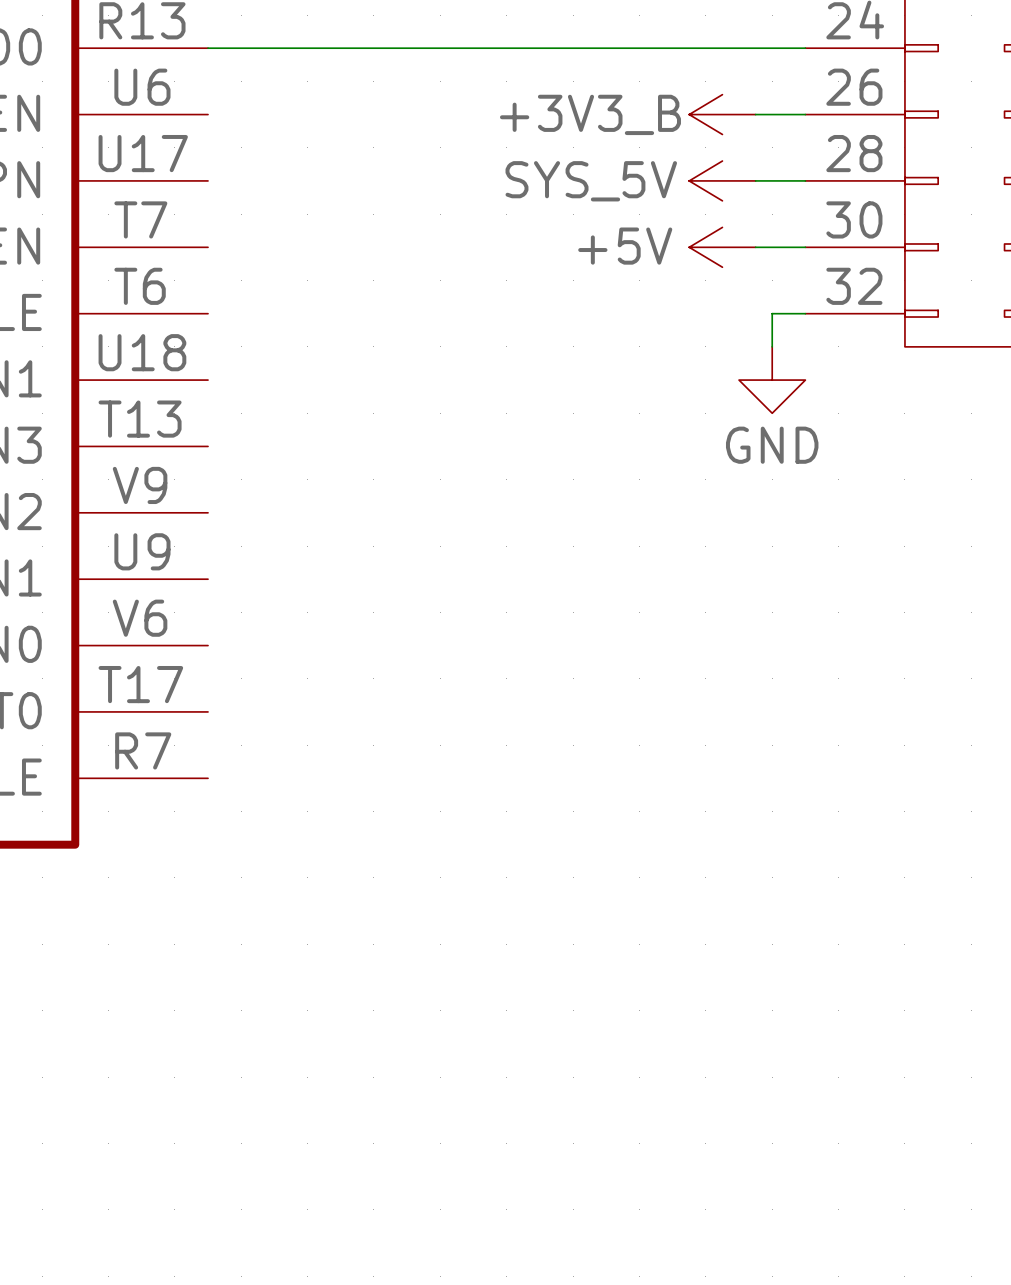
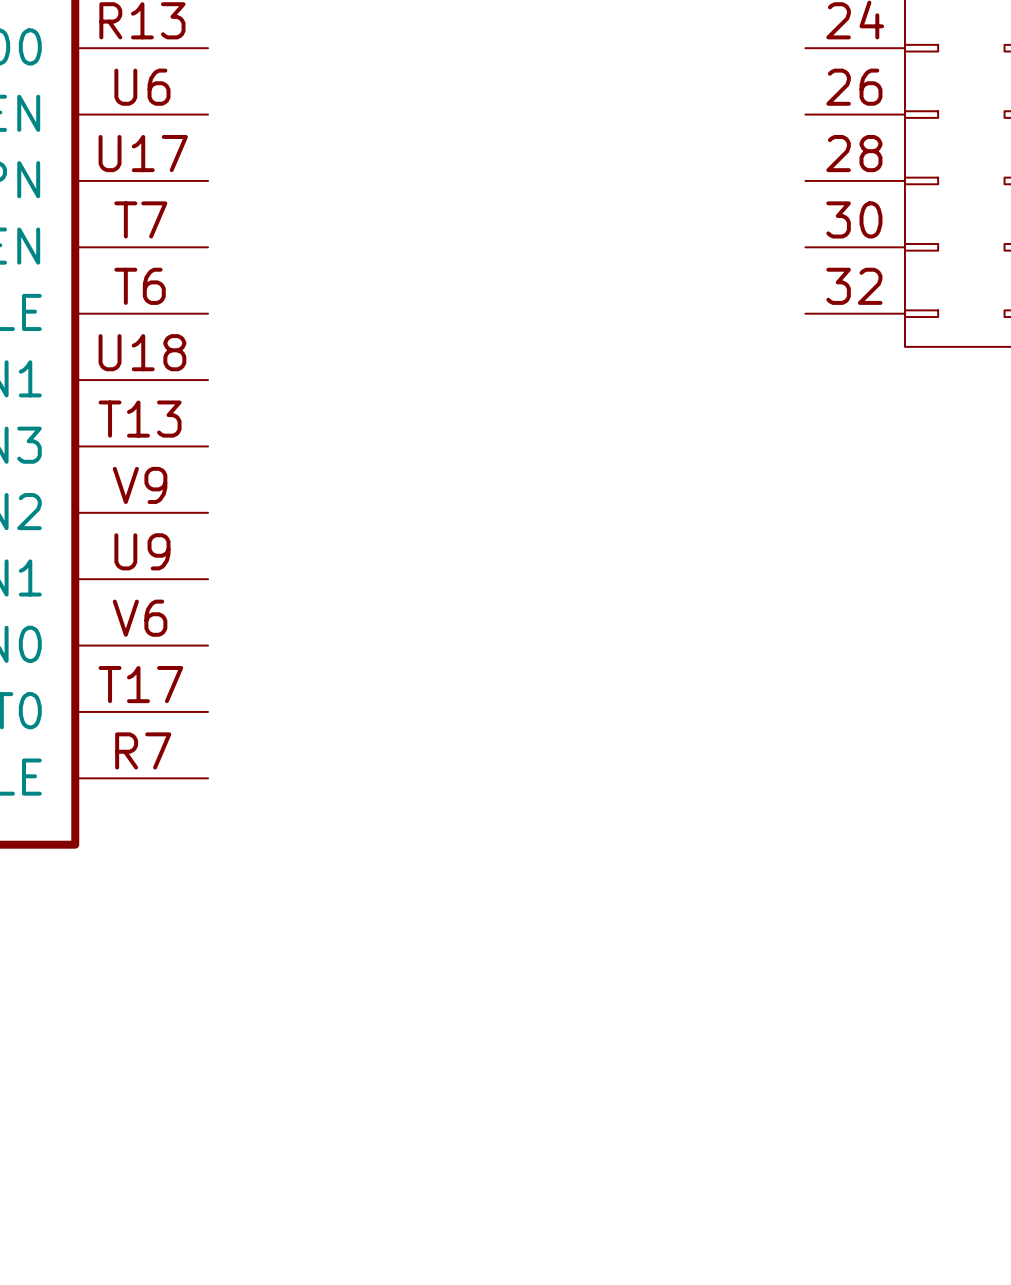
wire: (208, 48) (805, 48) -> none
power symbol: +3V3_B (722, 114) -> none
wire: (755, 114) (805, 114) -> none
power symbol: SYS_5V (722, 180) -> none
wire: (755, 180) (805, 180) -> none
power symbol: +5V (722, 247) -> none
wire: (755, 247) (805, 247) -> none
wire: (805, 313) (772, 313) (772, 346) -> none
power symbol: GND (772, 380) -> none

